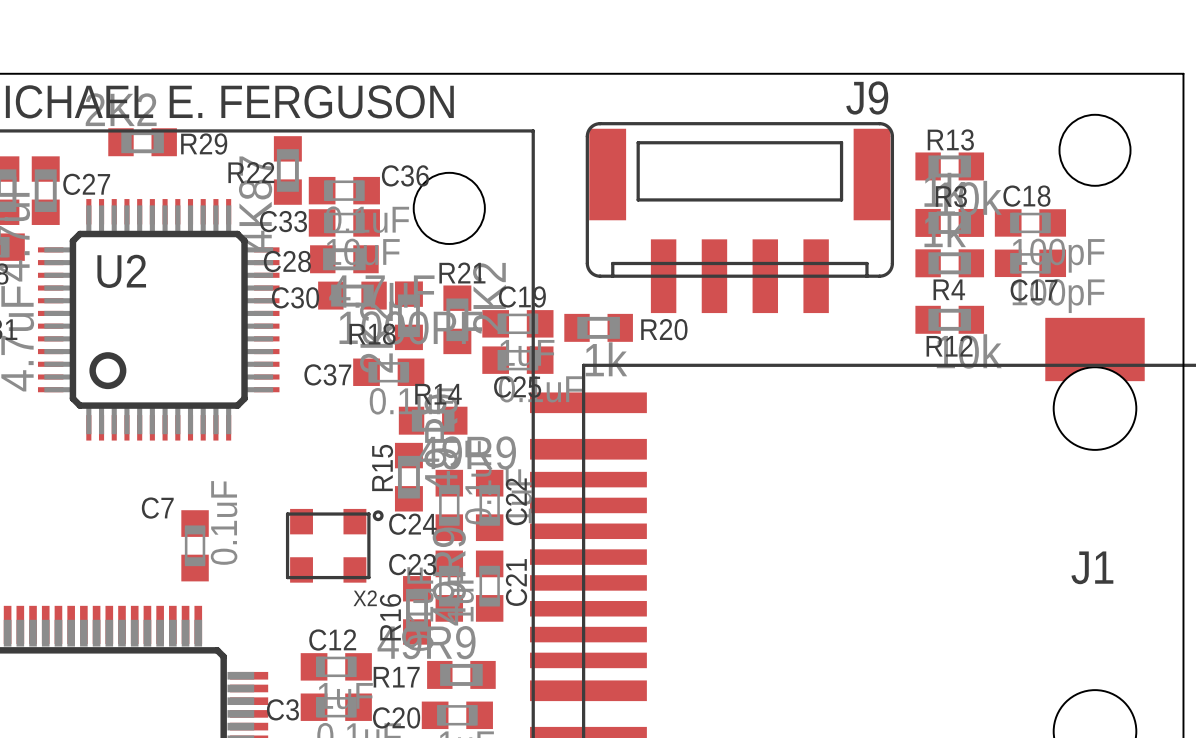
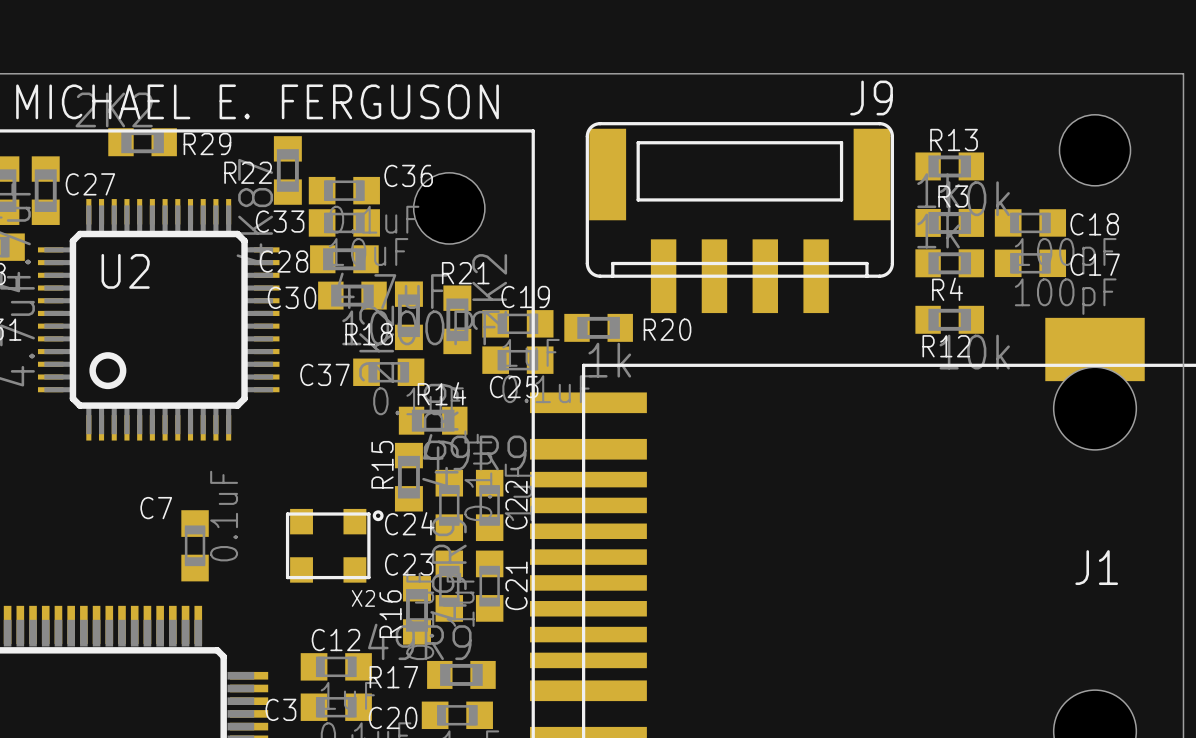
C18 name position: C18 (1026, 196) -> C18 (1094, 224)
C17 name position: C17 (1034, 290) -> C17 (1095, 264)

